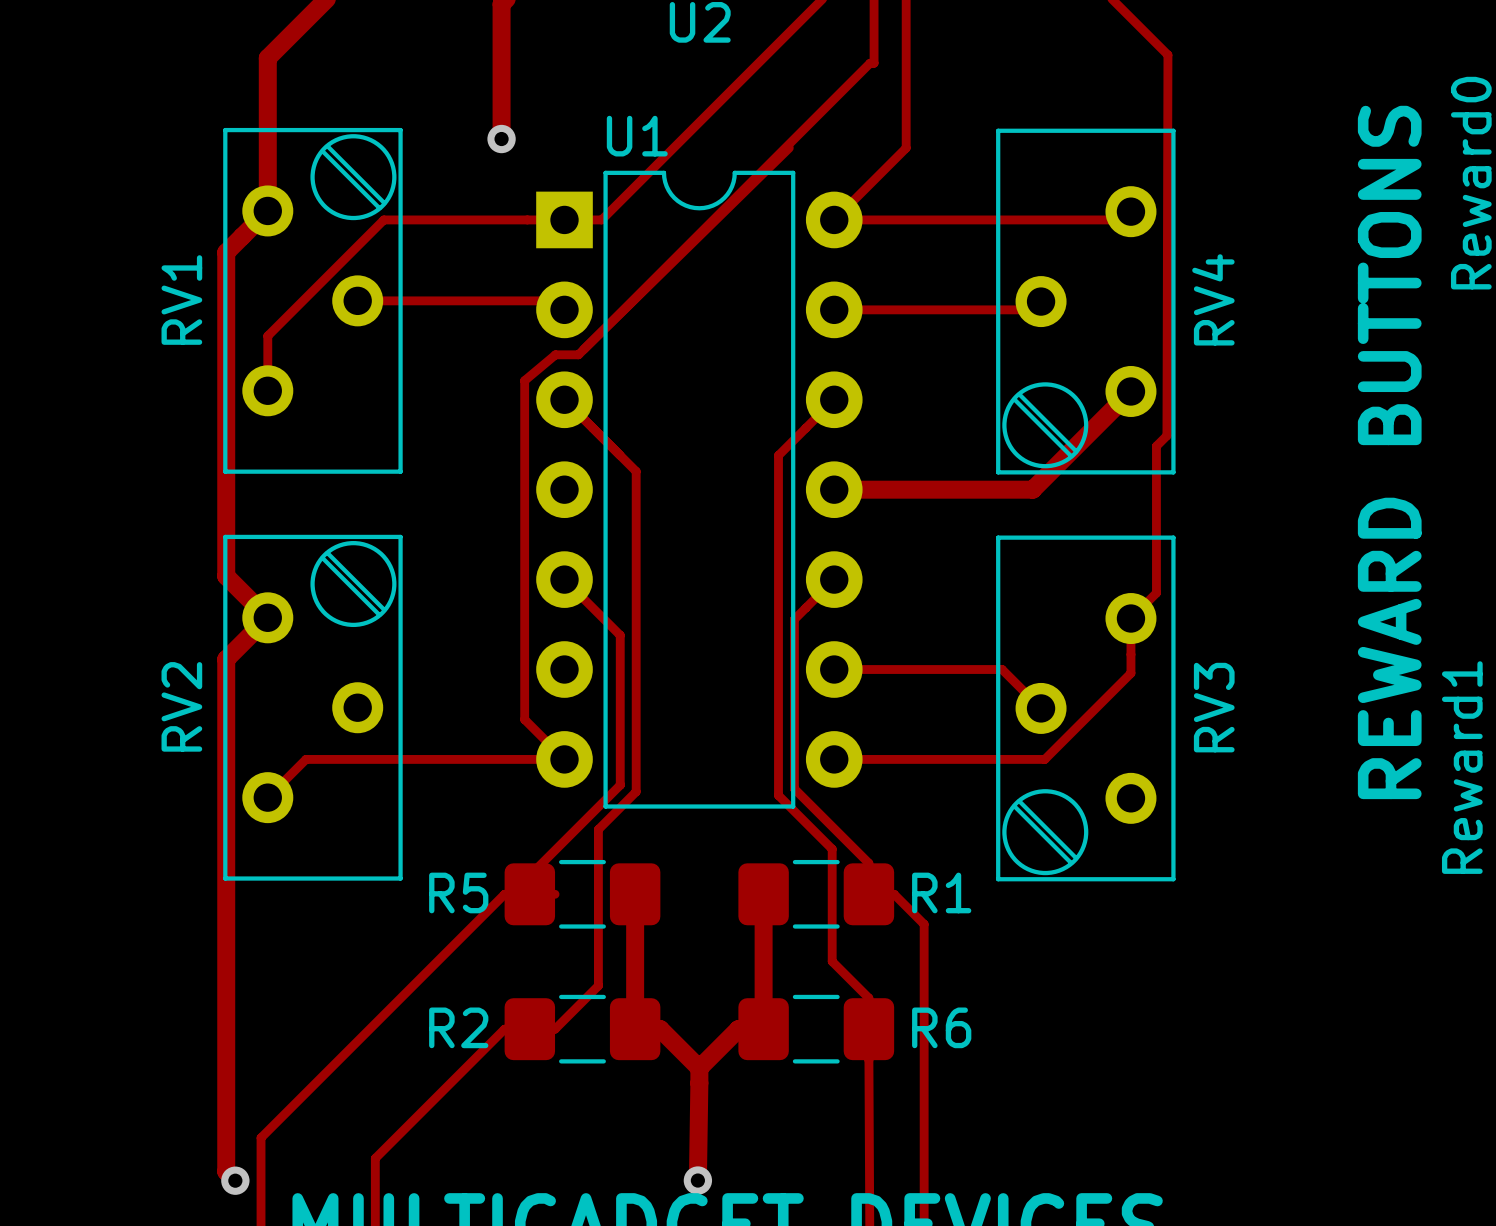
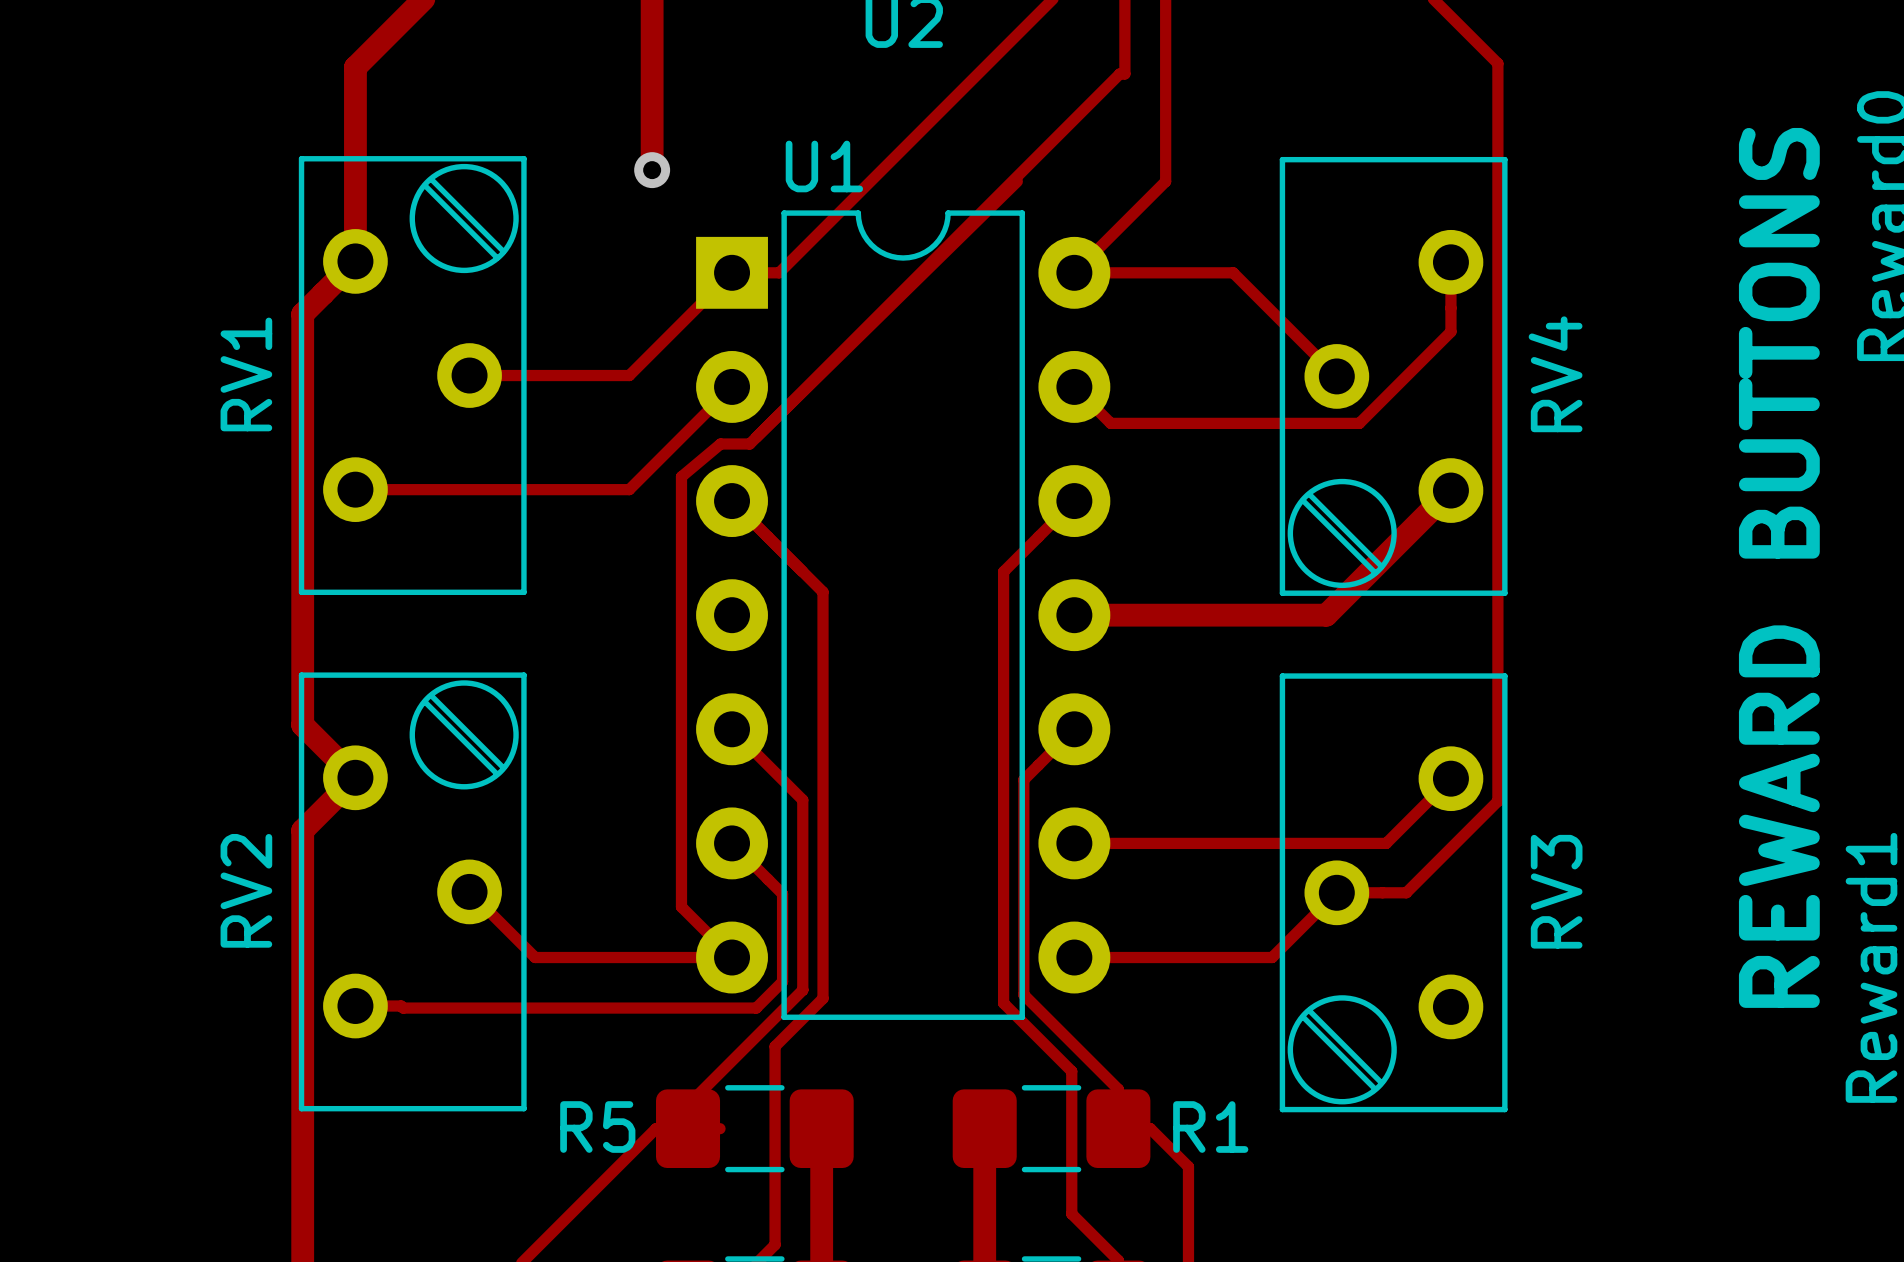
track: (1167, 55) (1166, 435) (1156, 446) (1156, 593) (1130, 618) (1130, 673) -> (1497, 63) (1497, 801) (1450, 848)
track: (1130, 211) (1122, 219) (959, 219) -> (1336, 376) (1233, 272)
track: (564, 219) (383, 219) (267, 336) (267, 390) -> (732, 386) (629, 489) (355, 489)
track: (483, 300) (555, 300) (564, 309) -> (629, 375) (732, 272)
track: (1041, 301) (1032, 309) (834, 309) -> (1450, 262) (1450, 331) (1359, 423) (1110, 423) (1074, 386)
track: none -> (732, 843) (782, 893) (782, 981) (756, 1008) (403, 1008) (401, 1006) (355, 1006)
track: (1002, 669) (1041, 708) -> (1287, 843) (1386, 843) (1450, 778)
track: (1095, 708) (1044, 759) (990, 759) -> (1406, 892) (1336, 892) (1272, 957)
track: (409, 759) (306, 759) (267, 797) -> (535, 957) (469, 891)

